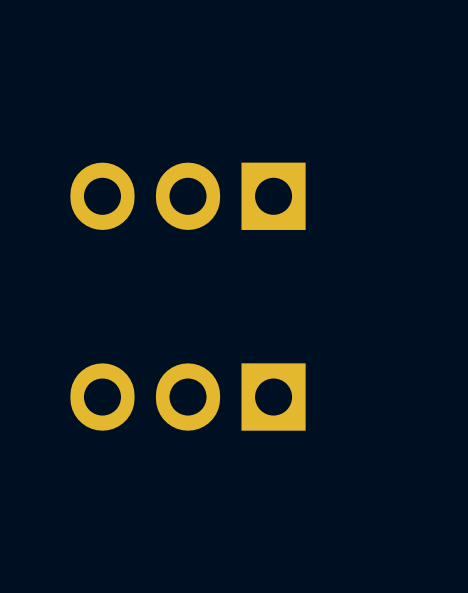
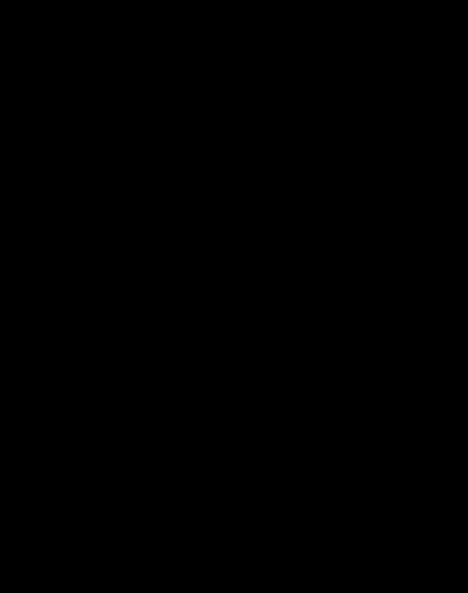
part: (188, 196) -> none
part: (188, 397) -> none

